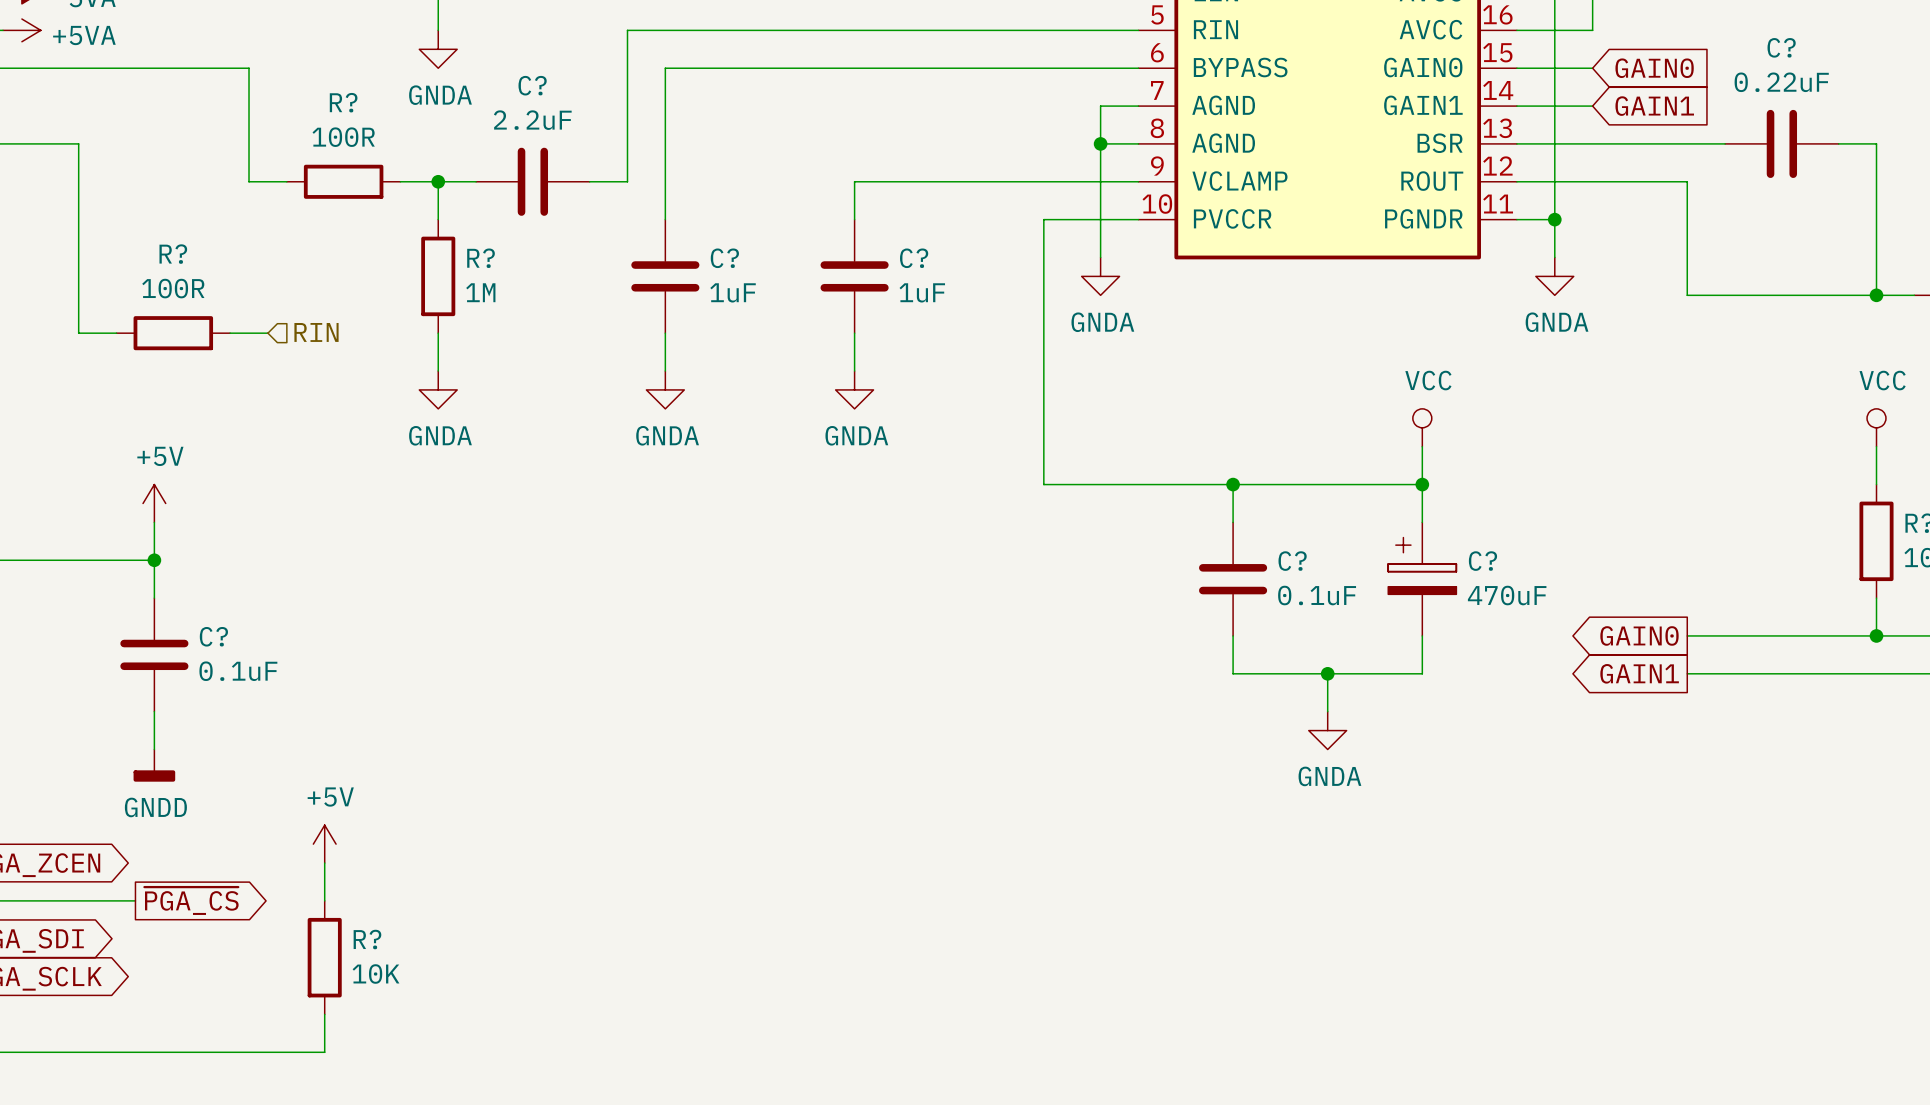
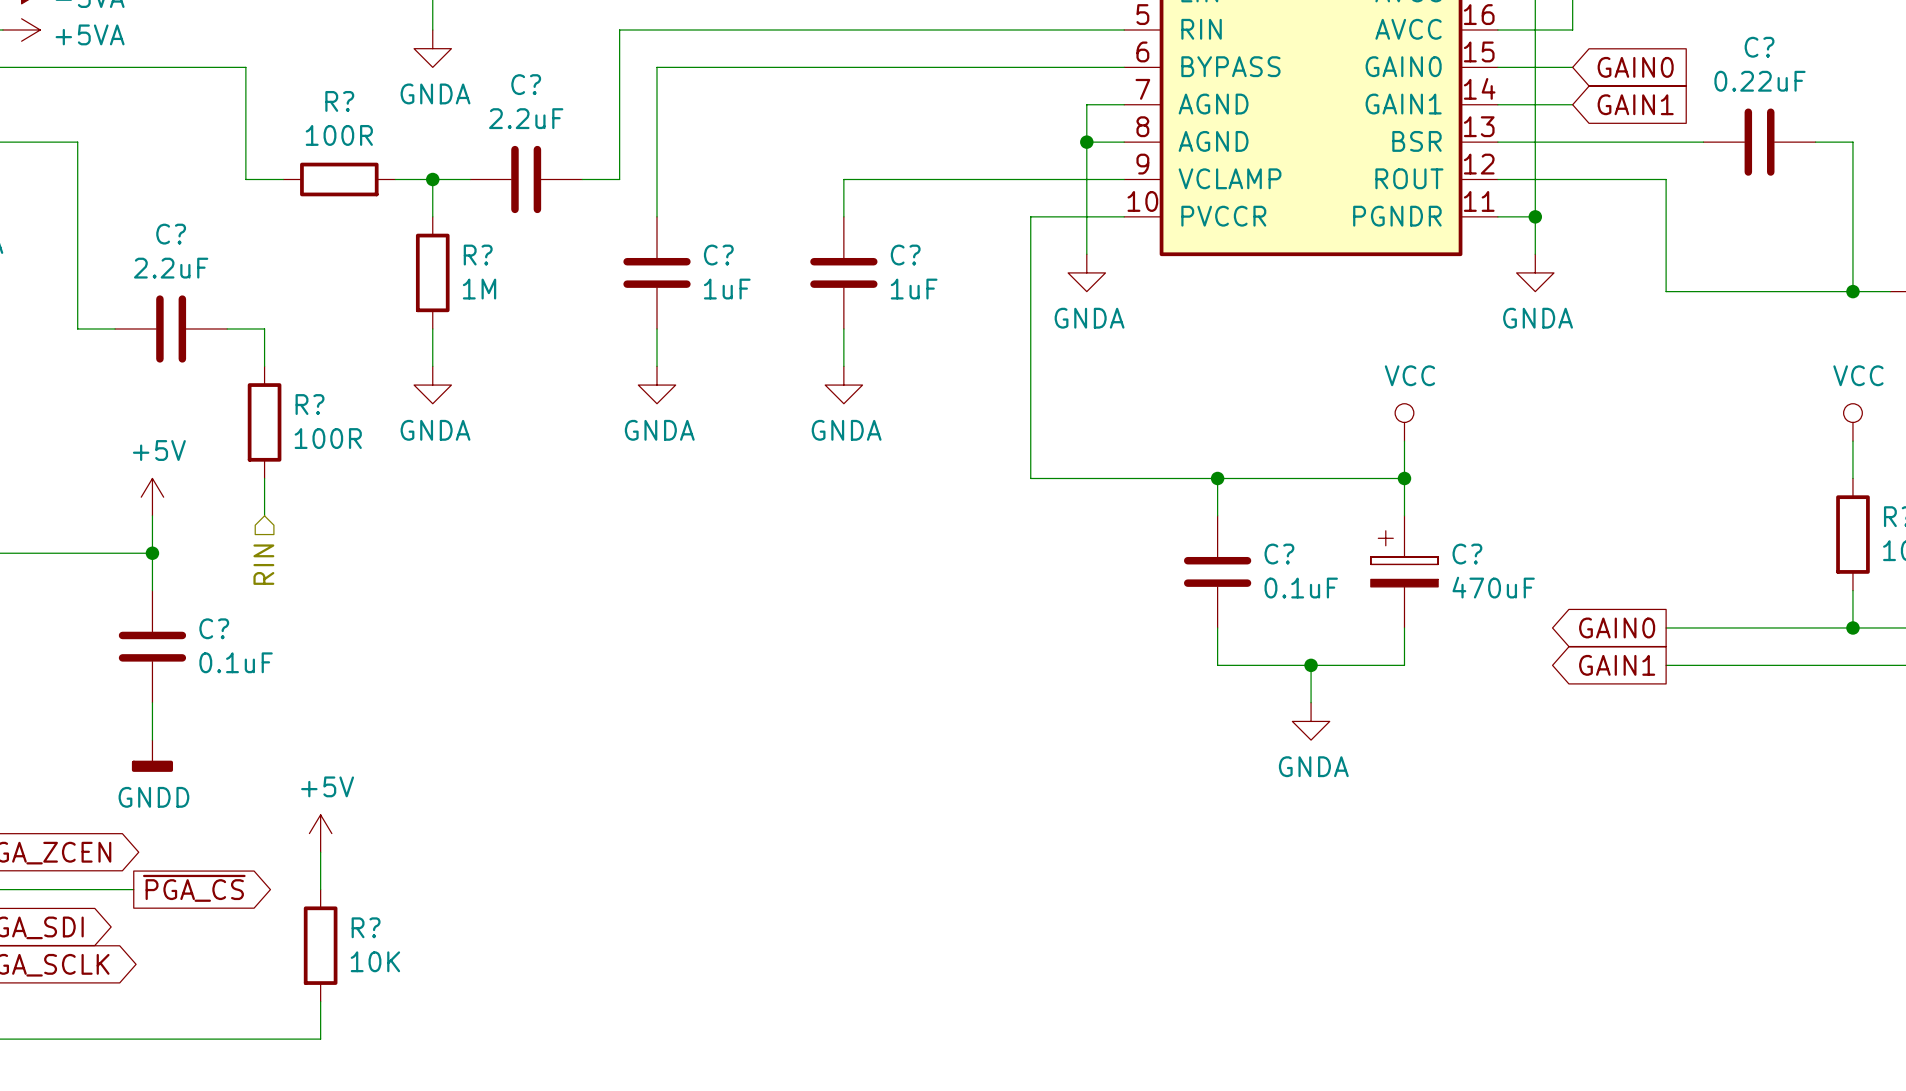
R? name position: R? (173, 254) -> R? (310, 404)
R? value position: 100R (173, 288) -> 100R (328, 438)
hierarchical label rotation: 0° (316, 332) -> 90° clockwise (263, 564)
hierarchical label position: RIN (316, 332) -> RIN (263, 564)
R? rotation: 0° (173, 333) -> 90° clockwise (264, 422)
R? position: (173, 333) -> (264, 422)
C?: none -> 2.2uF (171, 328)
wire: none -> (264, 328) (264, 366)
wire: none -> (264, 478) (264, 515)

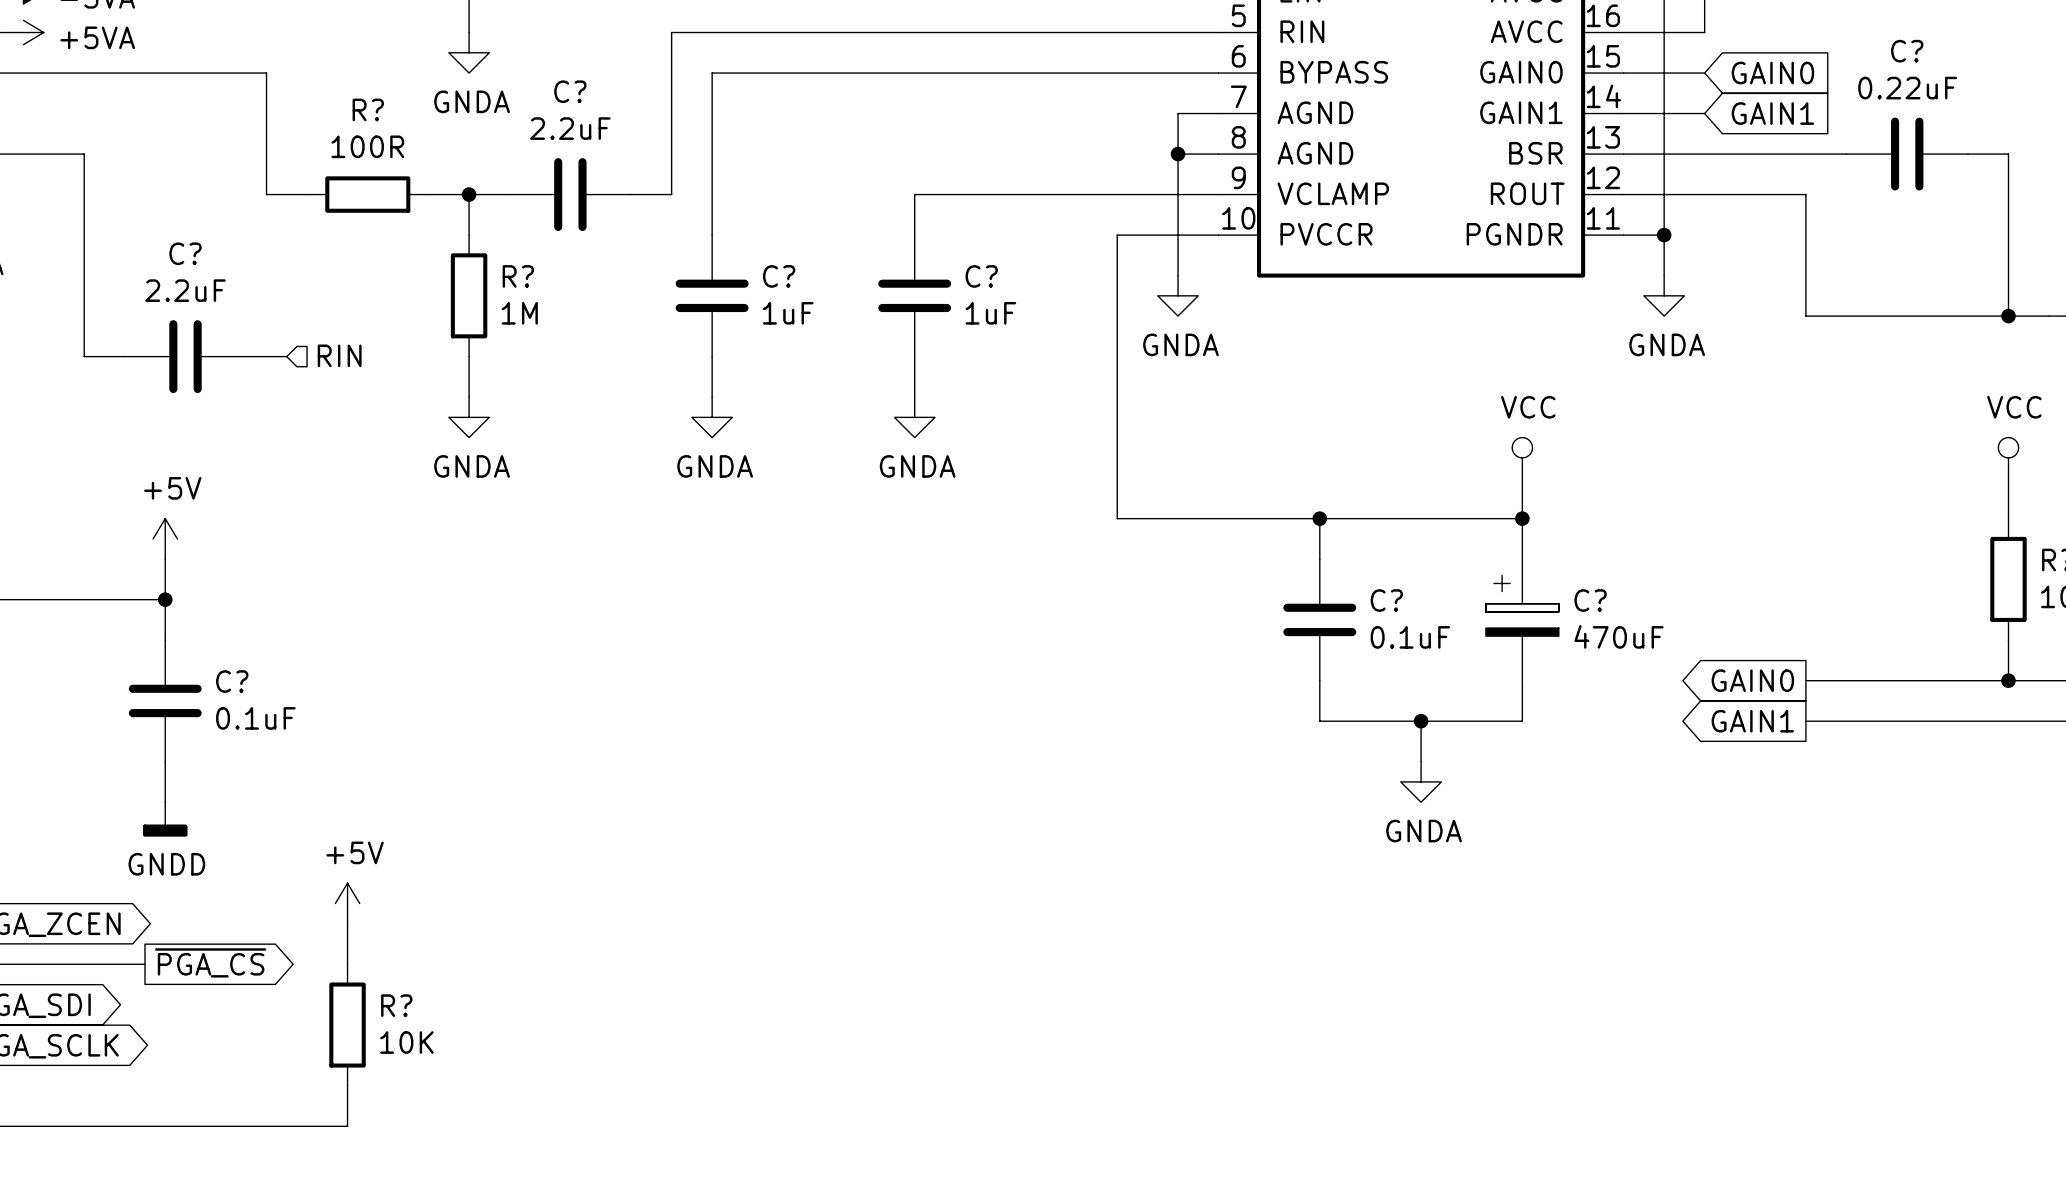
wire: (264, 328) (264, 366) -> none
R?: 100R (264, 422) -> none
wire: (264, 478) (264, 515) -> none
hierarchical label rotation: 0° (263, 564) -> 90° counterclockwise (339, 355)
hierarchical label position: RIN (263, 564) -> RIN (339, 355)

